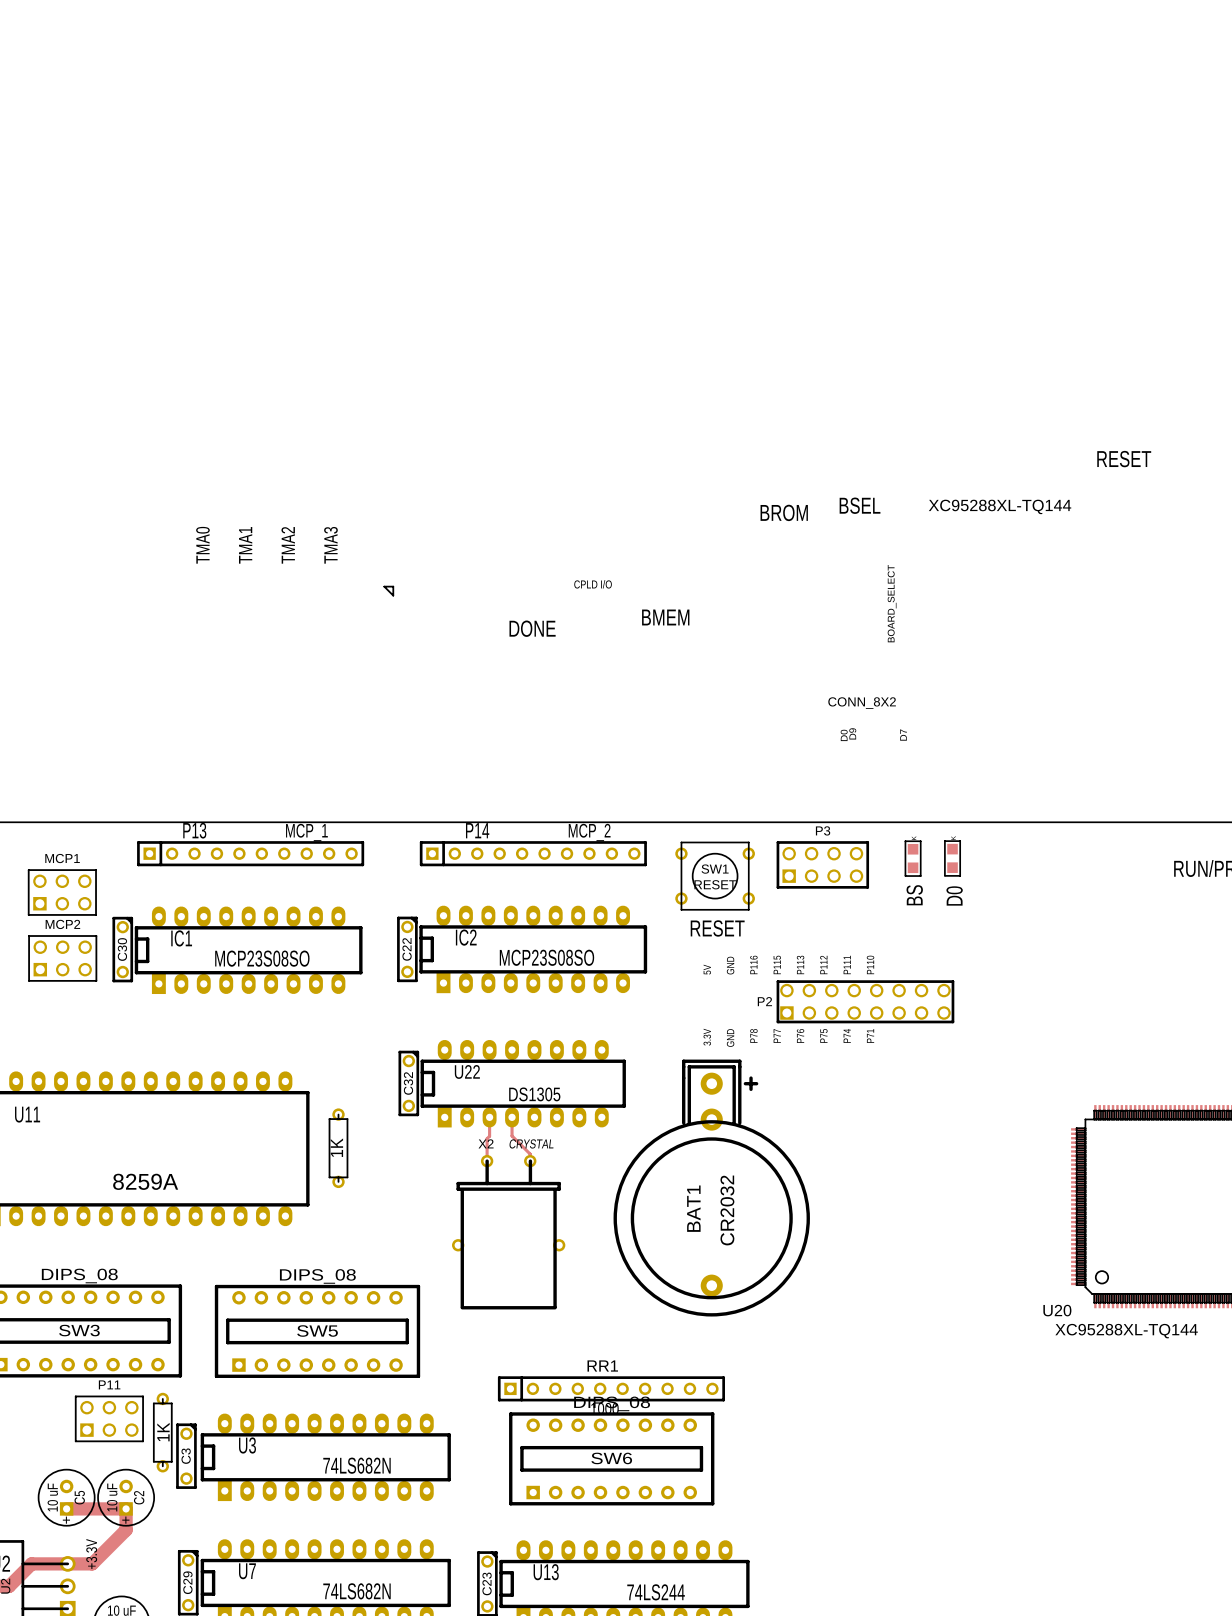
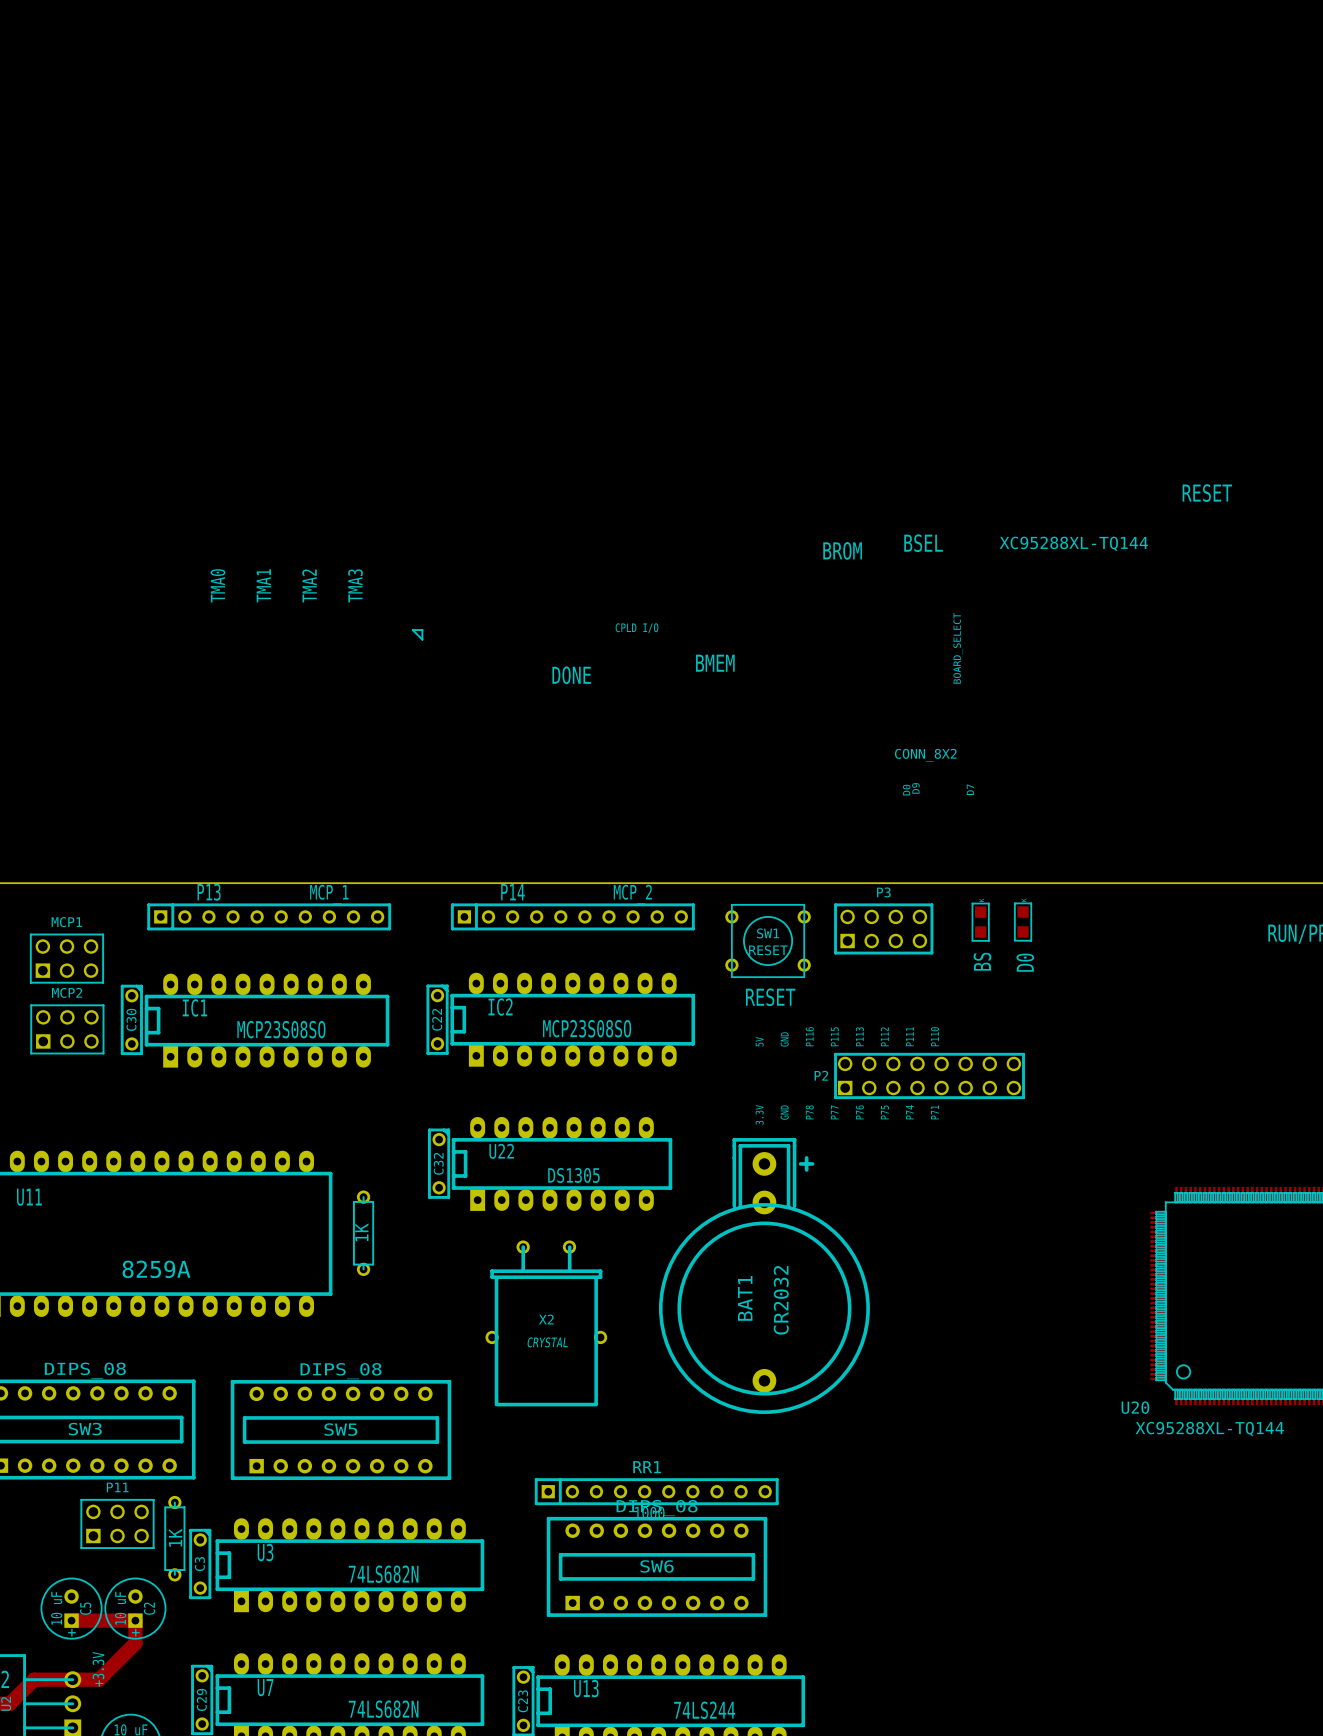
track: (489, 1117) (487, 1161) -> none
track: (512, 1117) (512, 1135) (530, 1154) (530, 1161) -> none
X2 name position: X2 (486, 1143) -> X2 (546, 1319)
X2 value position: CRYSTAL (531, 1143) -> CRYSTAL (547, 1342)

